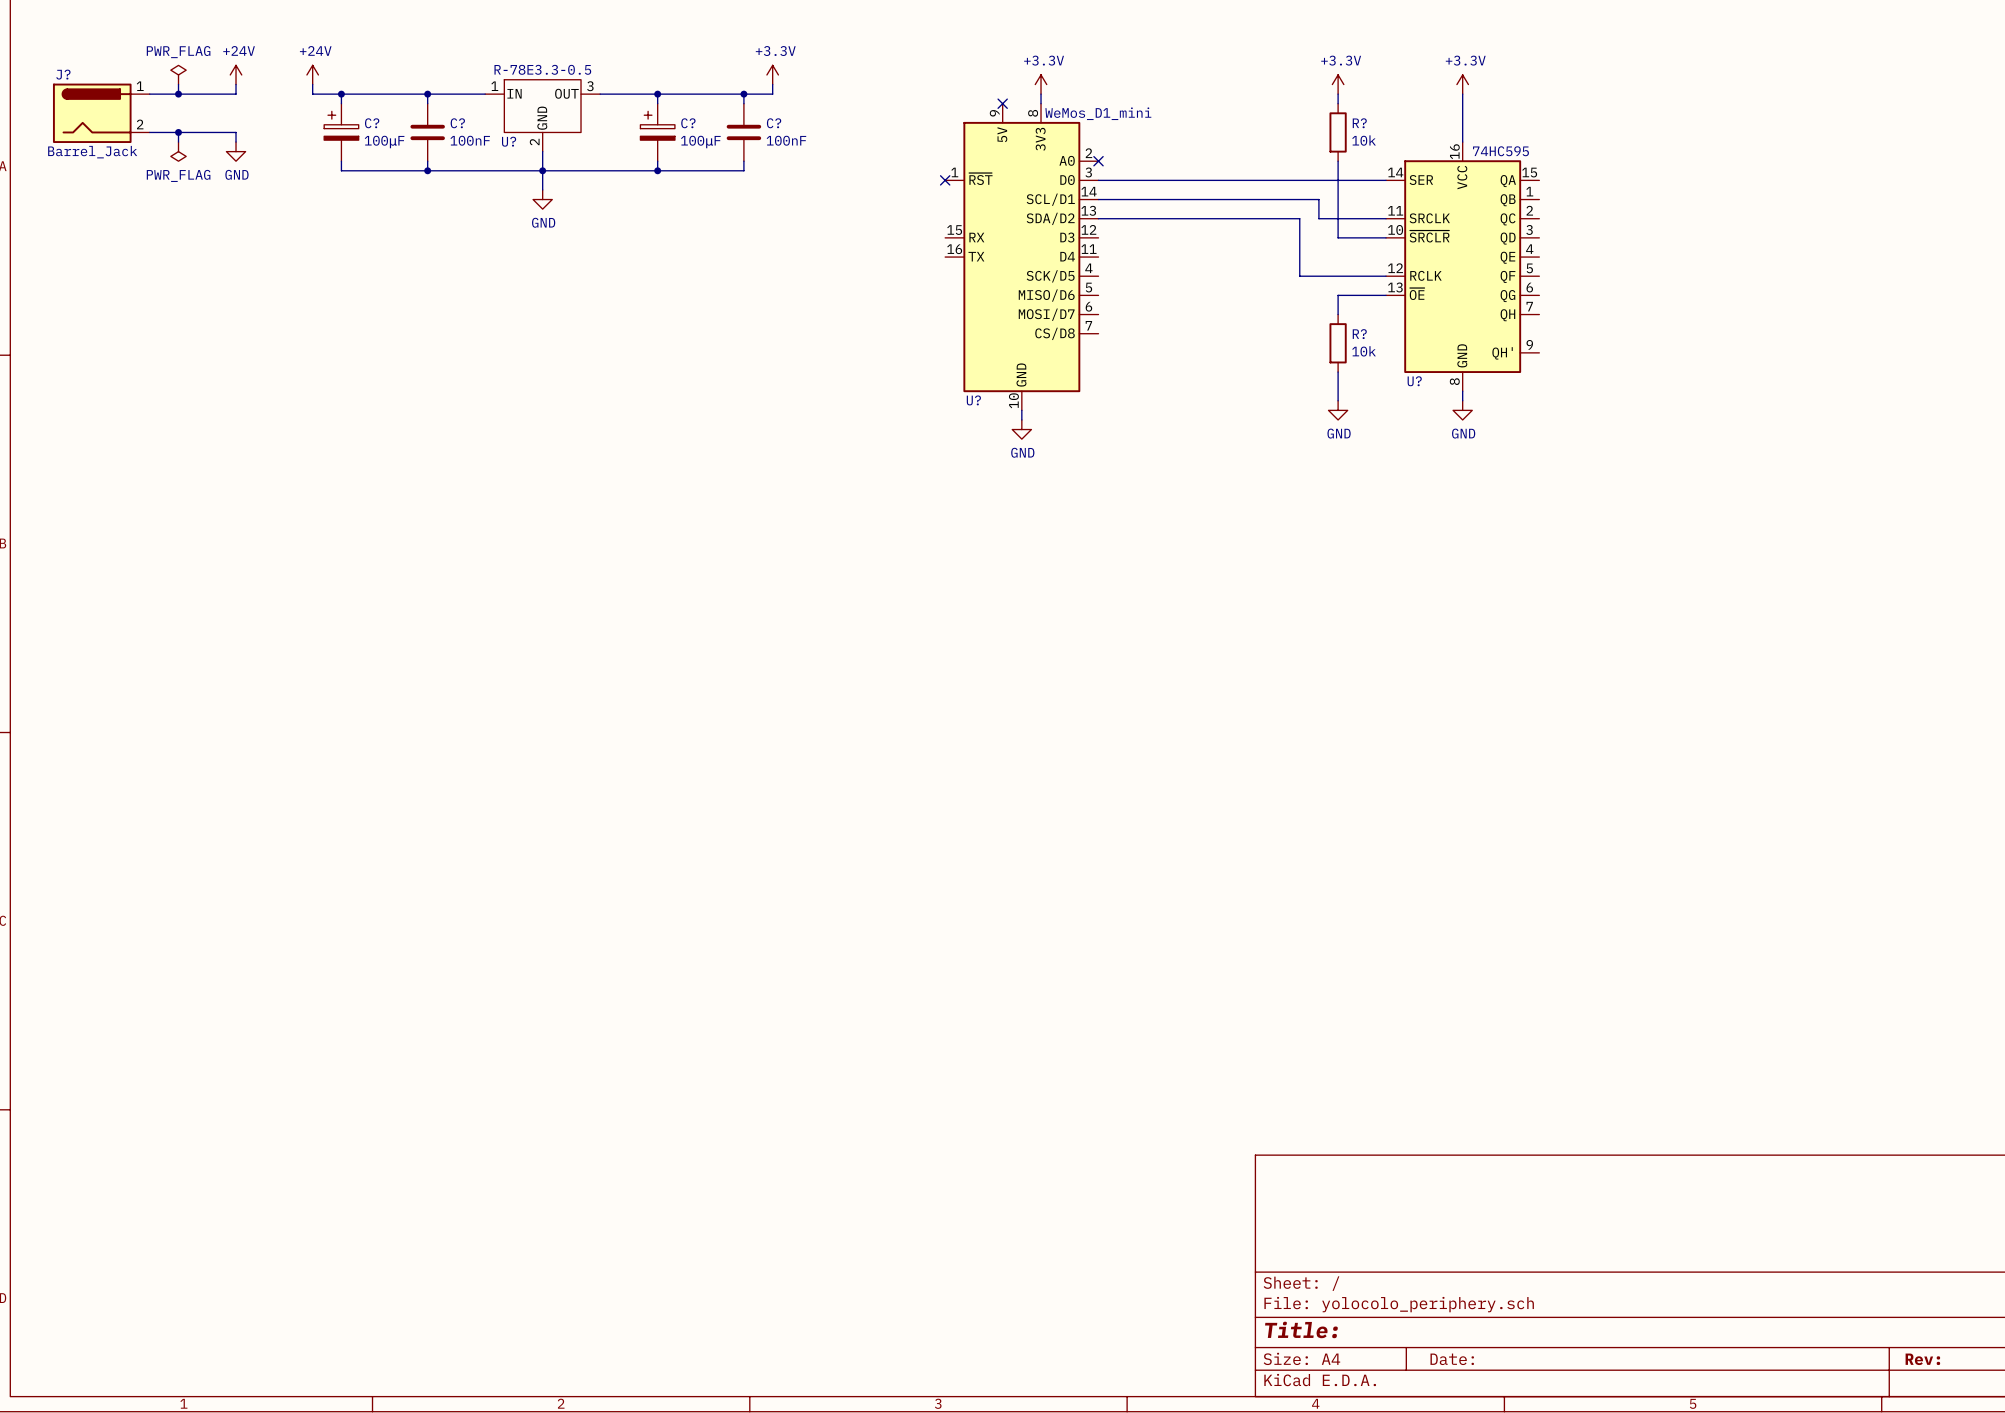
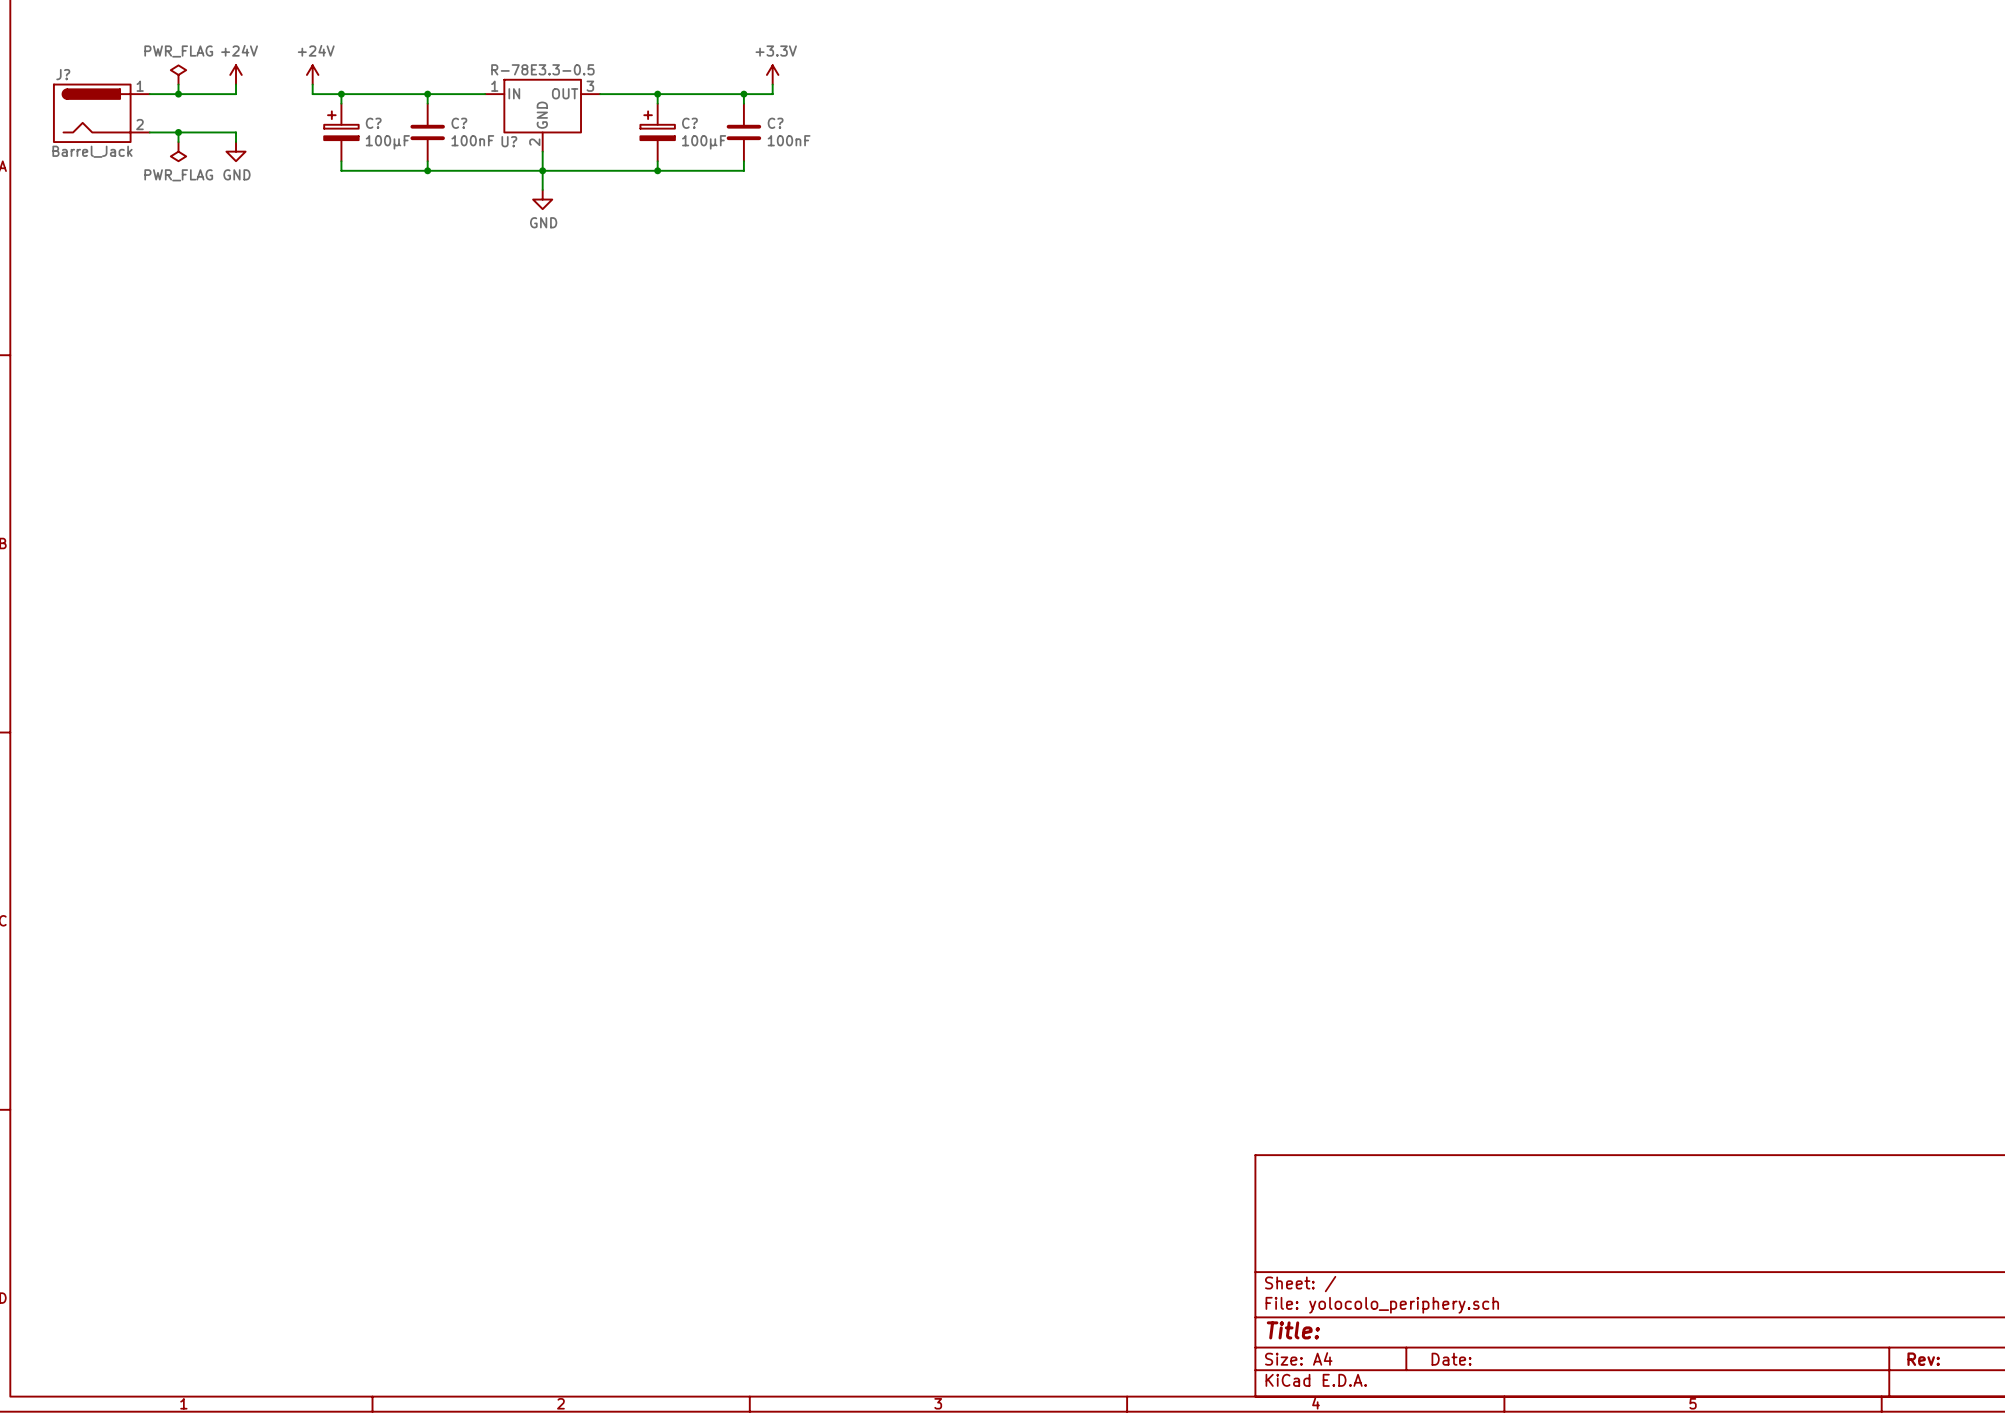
power symbol: +3.3V (1041, 84) -> none
power symbol: +3.3V (1338, 84) -> none
power symbol: +3.3V (1462, 84) -> none
wire: (1041, 94) (1041, 103) -> none
wire: (1338, 94) (1338, 103) -> none
wire: (1462, 94) (1462, 142) -> none
no-connect mark: (1002, 103) -> none
R?: 10k (1338, 132) -> none
no-connect mark: (1098, 161) -> none
wire: (1338, 161) (1338, 237) (1386, 237) -> none
no-connect mark: (945, 180) -> none
wire: (1098, 180) (1386, 180) -> none
wire: (1098, 199) (1318, 199) (1318, 218) (1386, 218) -> none
wire: (1098, 218) (1299, 218) (1299, 276) (1386, 276) -> none
U?: WeMos_D1_mini (1021, 257) -> none
U?: 74HC595 (1462, 266) -> none
wire: (1386, 295) (1338, 295) (1338, 314) -> none
R?: 10k (1338, 343) -> none
wire: (1338, 372) (1338, 400) -> none
wire: (1462, 391) (1462, 400) -> none
wire: (1021, 410) (1021, 419) -> none
power symbol: GND (1338, 410) -> none
power symbol: GND (1462, 410) -> none
power symbol: GND (1021, 429) -> none

